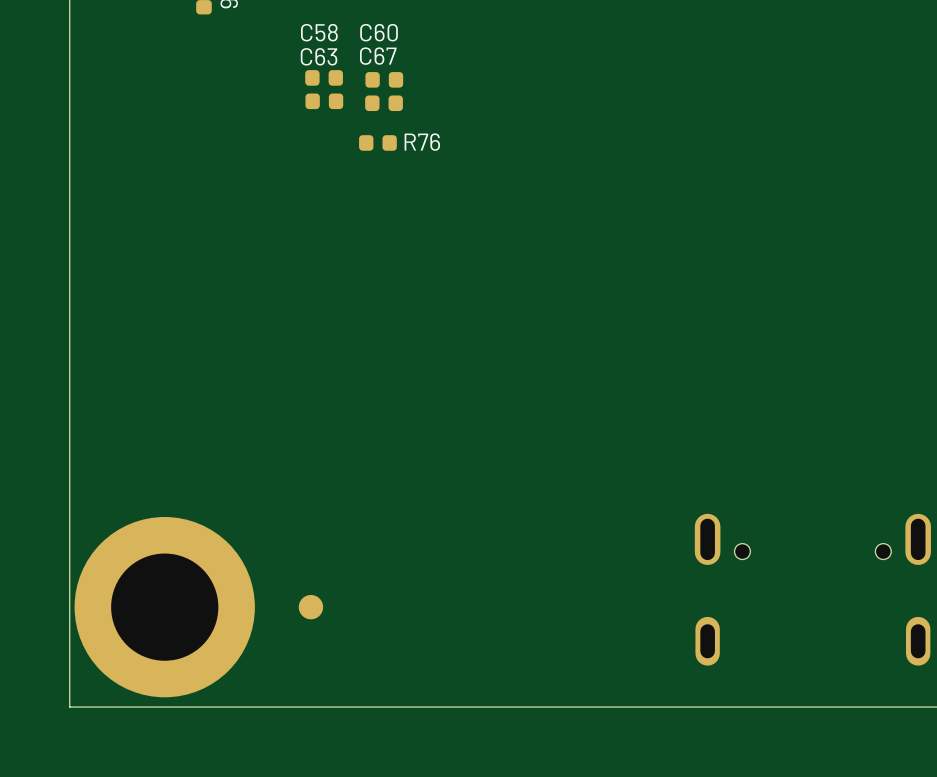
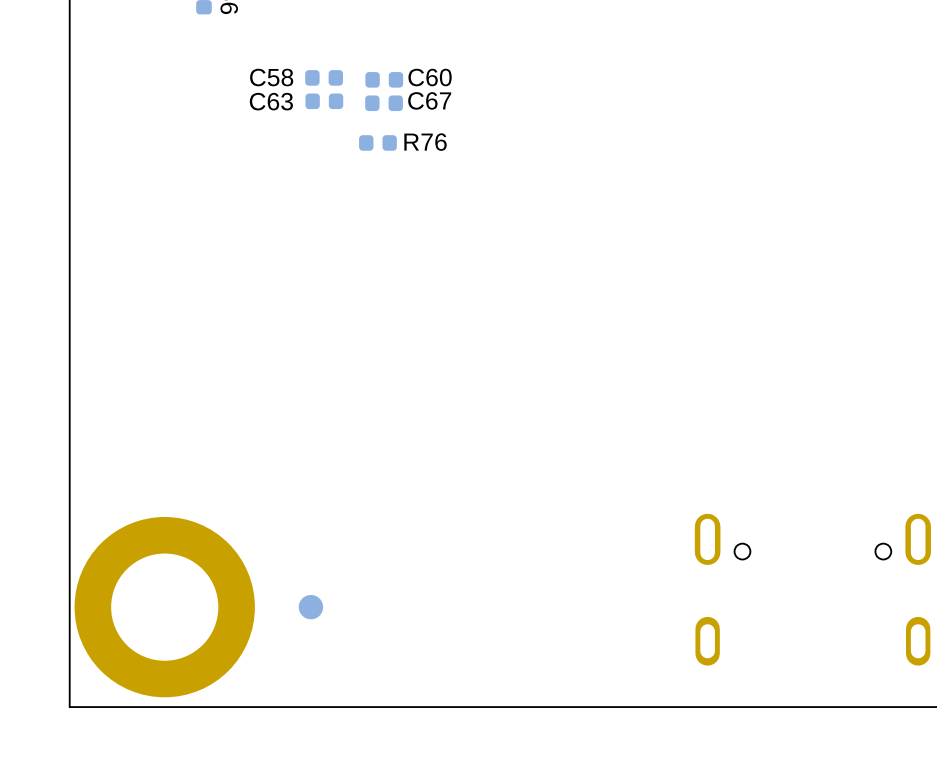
C58 name position: C58 (319, 32) -> C58 (271, 77)
C60 name position: C60 (379, 32) -> C60 (430, 77)
C63 name position: C63 (319, 56) -> C63 (271, 101)
C67 name position: C67 (378, 56) -> C67 (429, 100)

